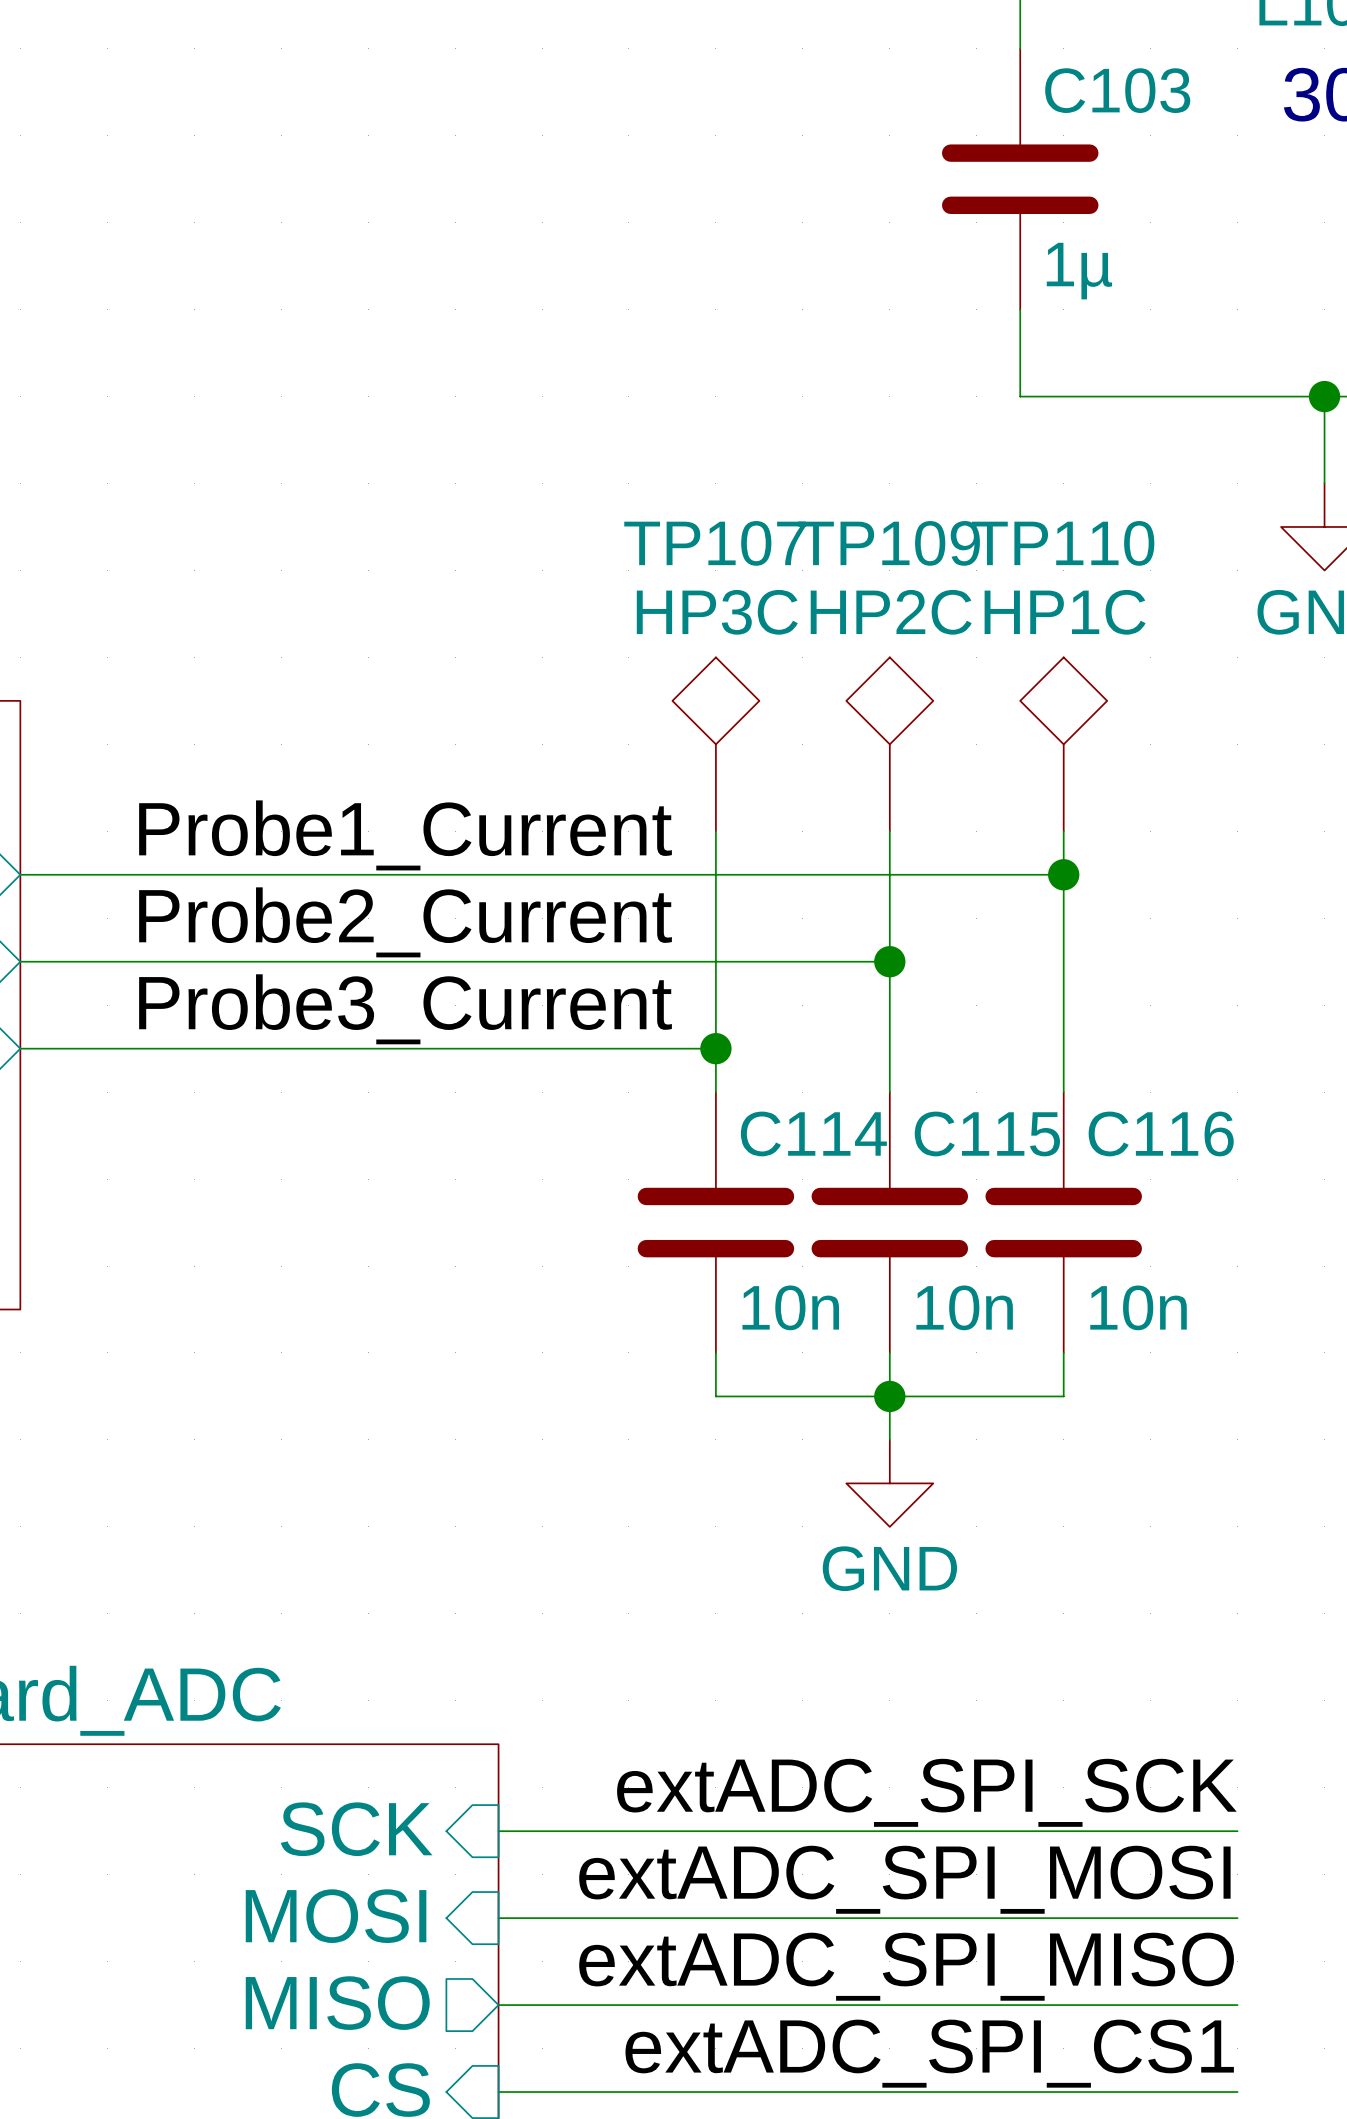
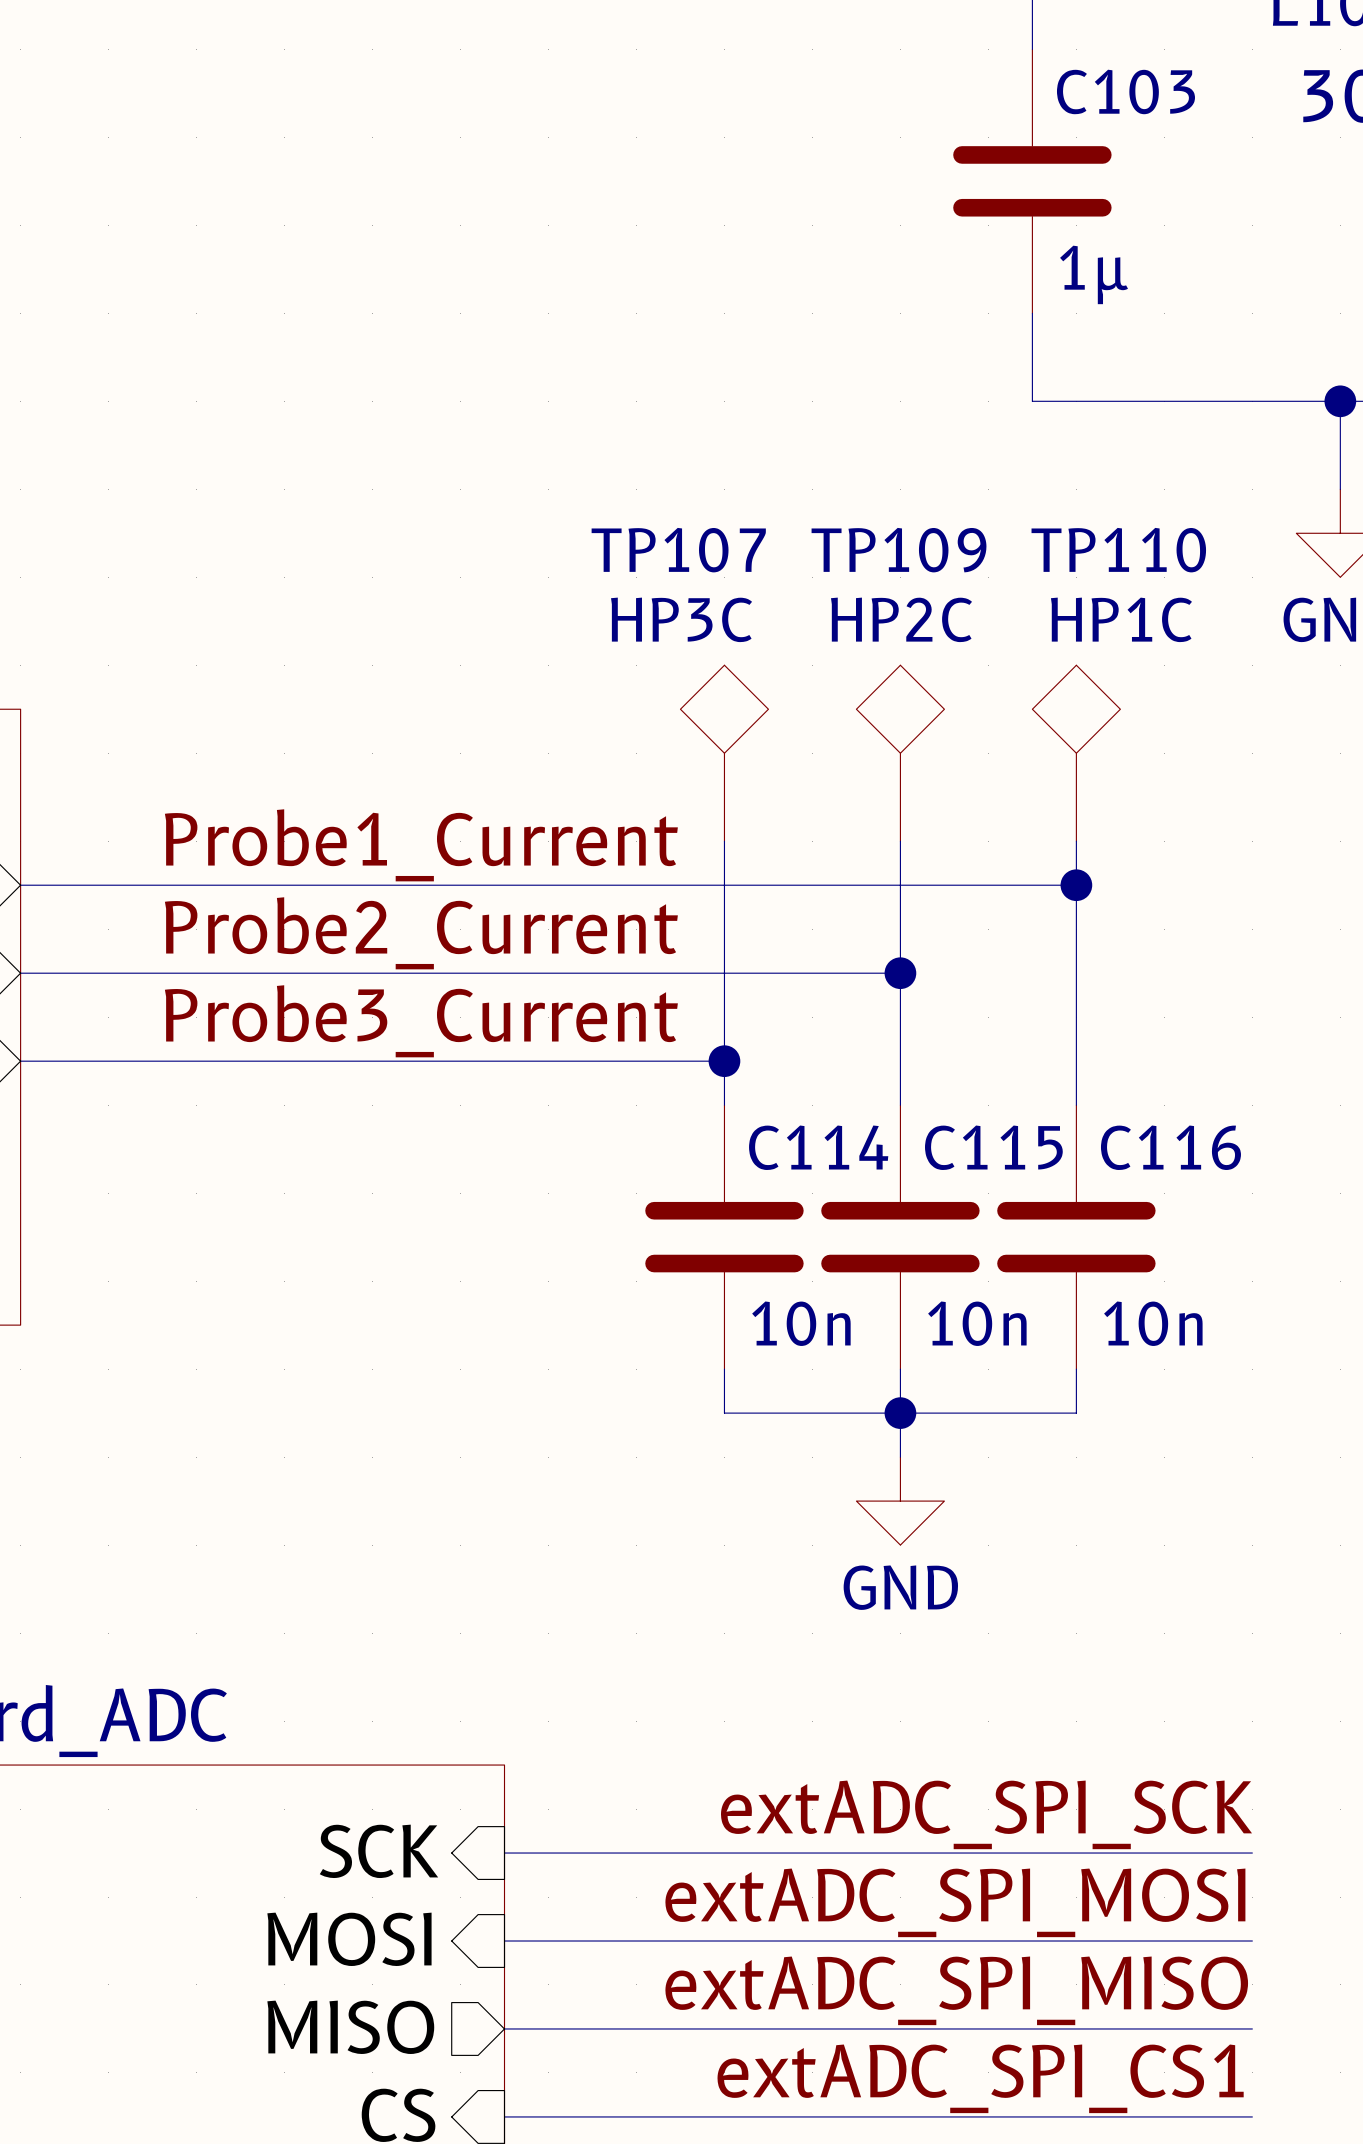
TP107 name position: TP107 (715, 543) -> TP107 (678, 550)
TP110 name position: TP110 (1063, 543) -> TP110 (1118, 550)
TP107 value position: HP3C (717, 612) -> HP3C (681, 619)
TP110 value position: HP1C (1065, 612) -> HP1C (1121, 619)

